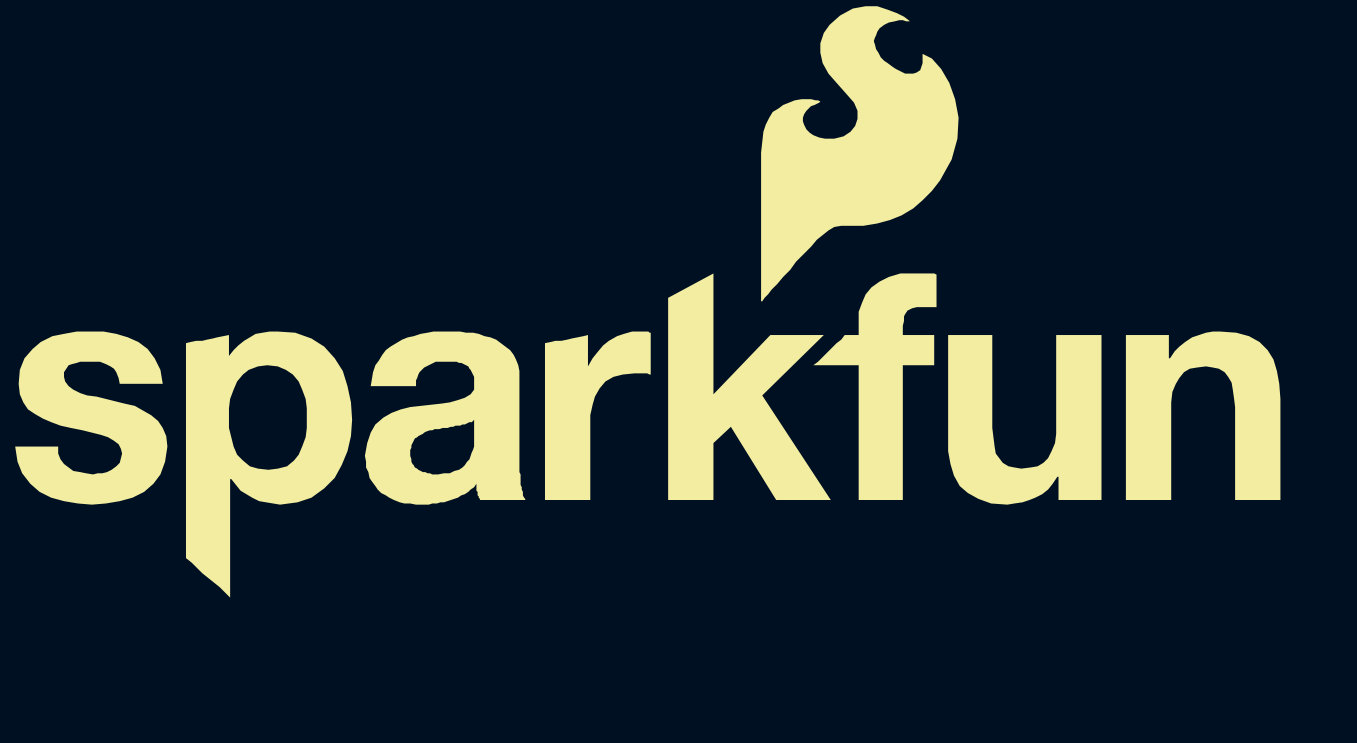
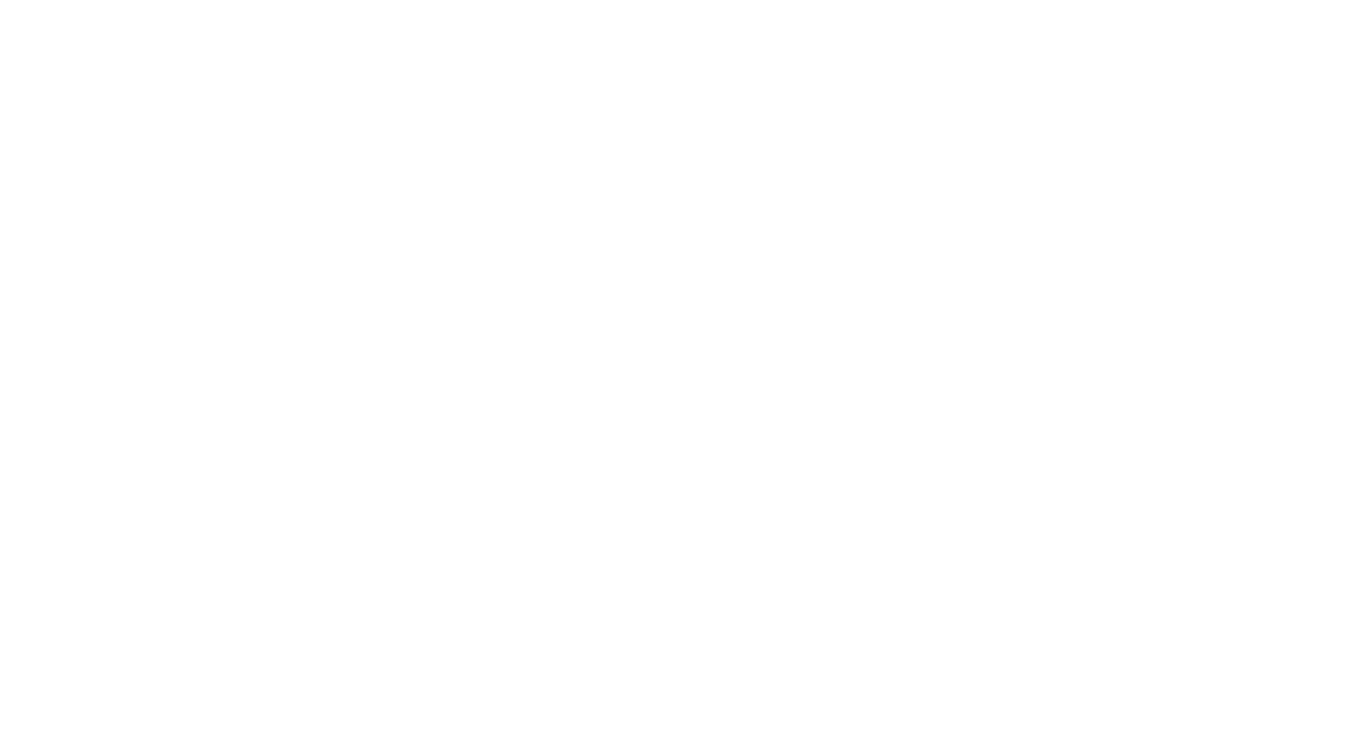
drawing: [15, 6, 1281, 598] -> none

